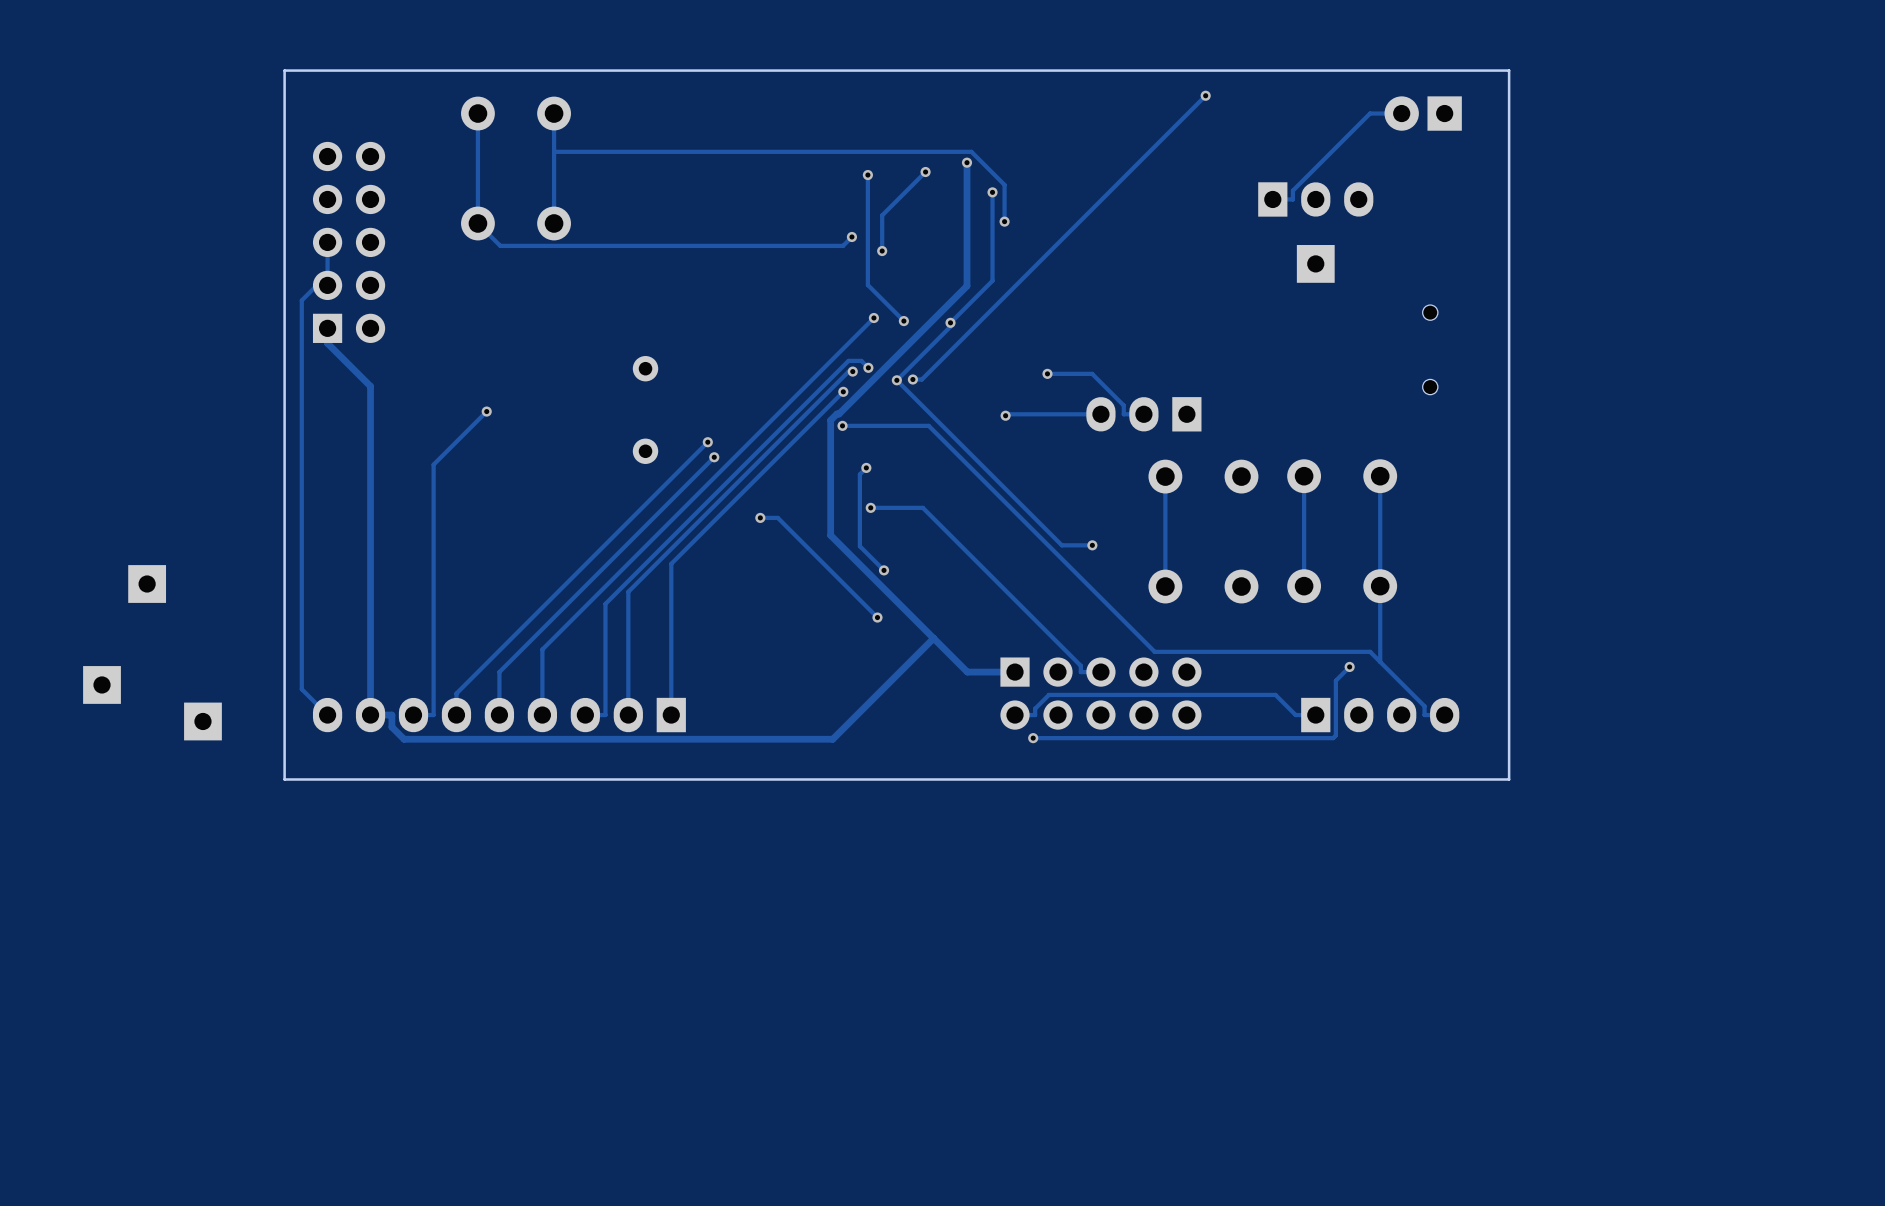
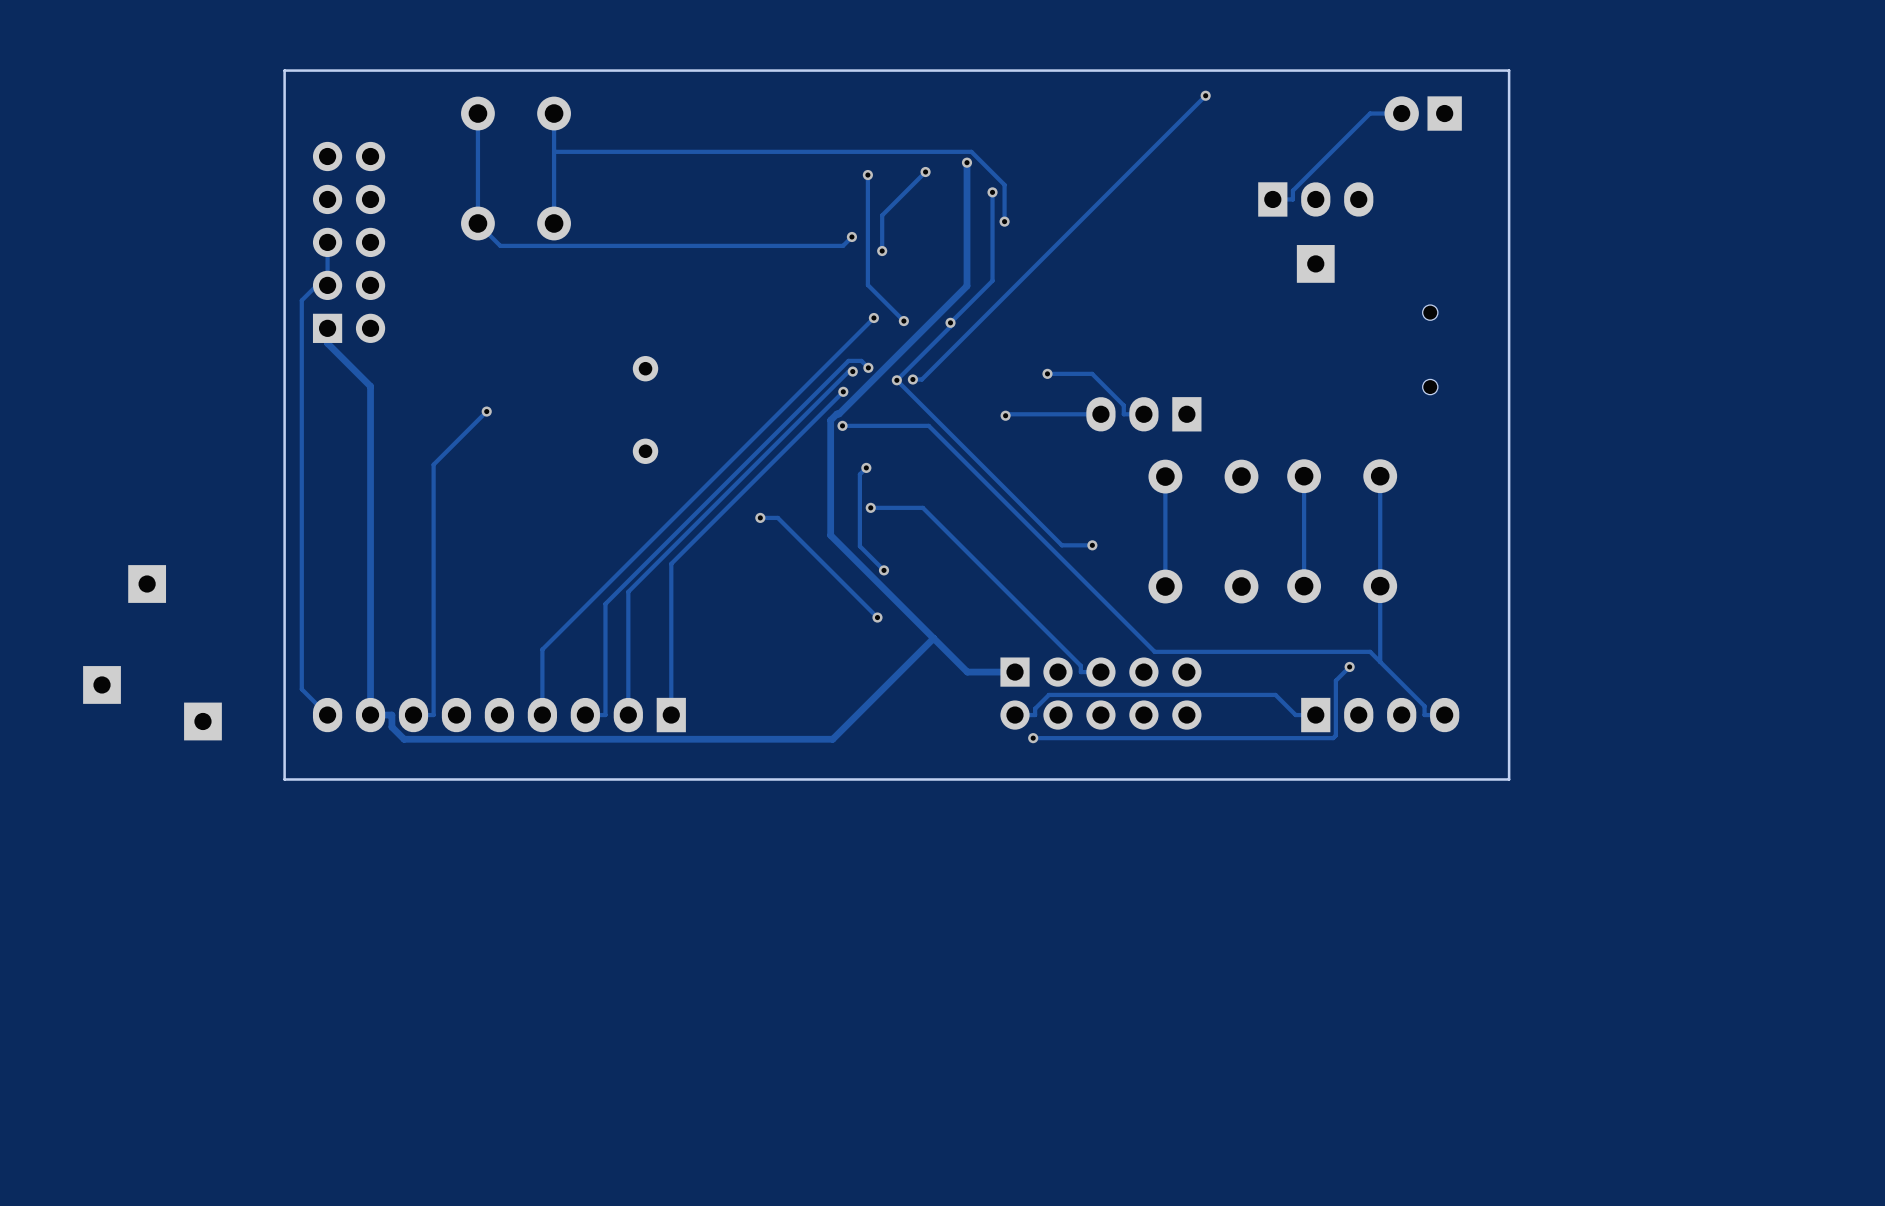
track: (707, 442) (456, 693) (456, 715) -> none
via: (707, 442) -> none
track: (714, 457) (499, 672) (499, 715) -> none
via: (714, 457) -> none

